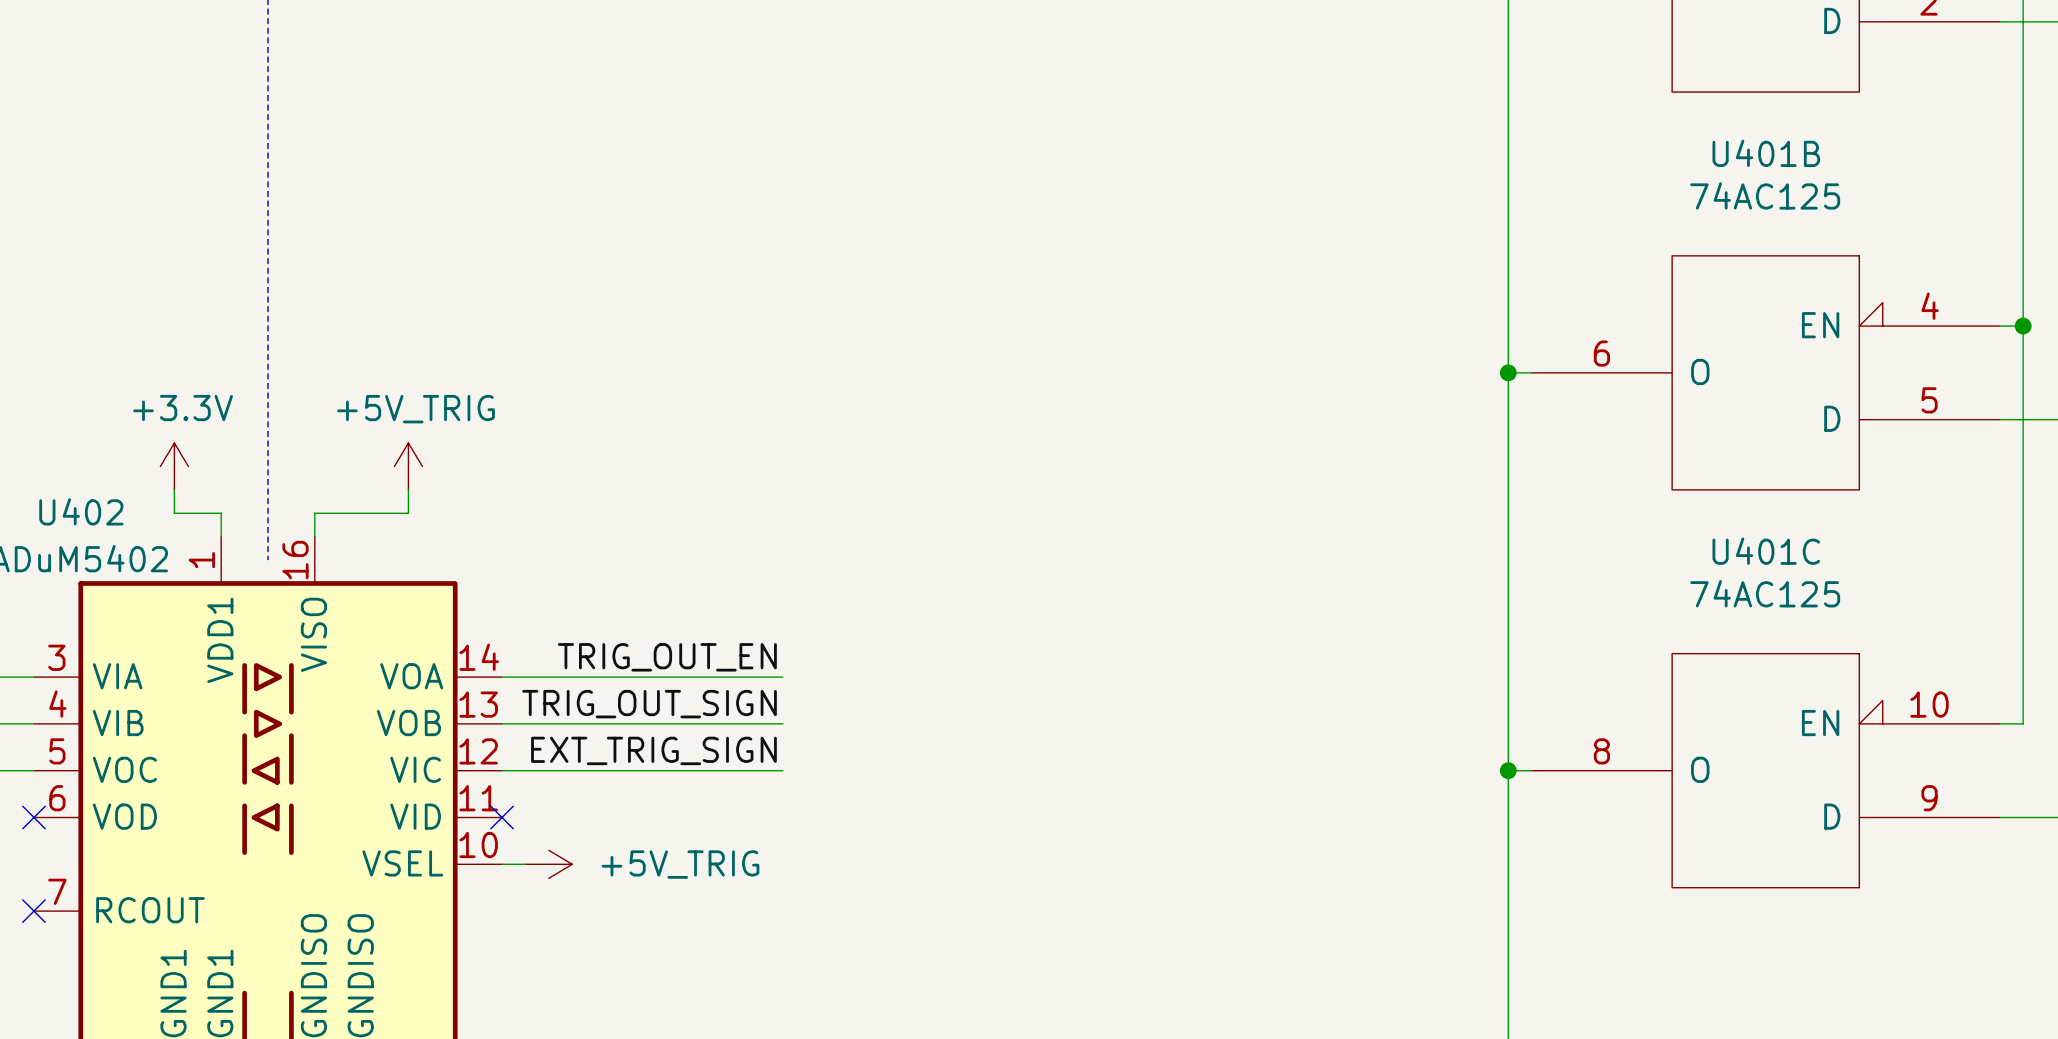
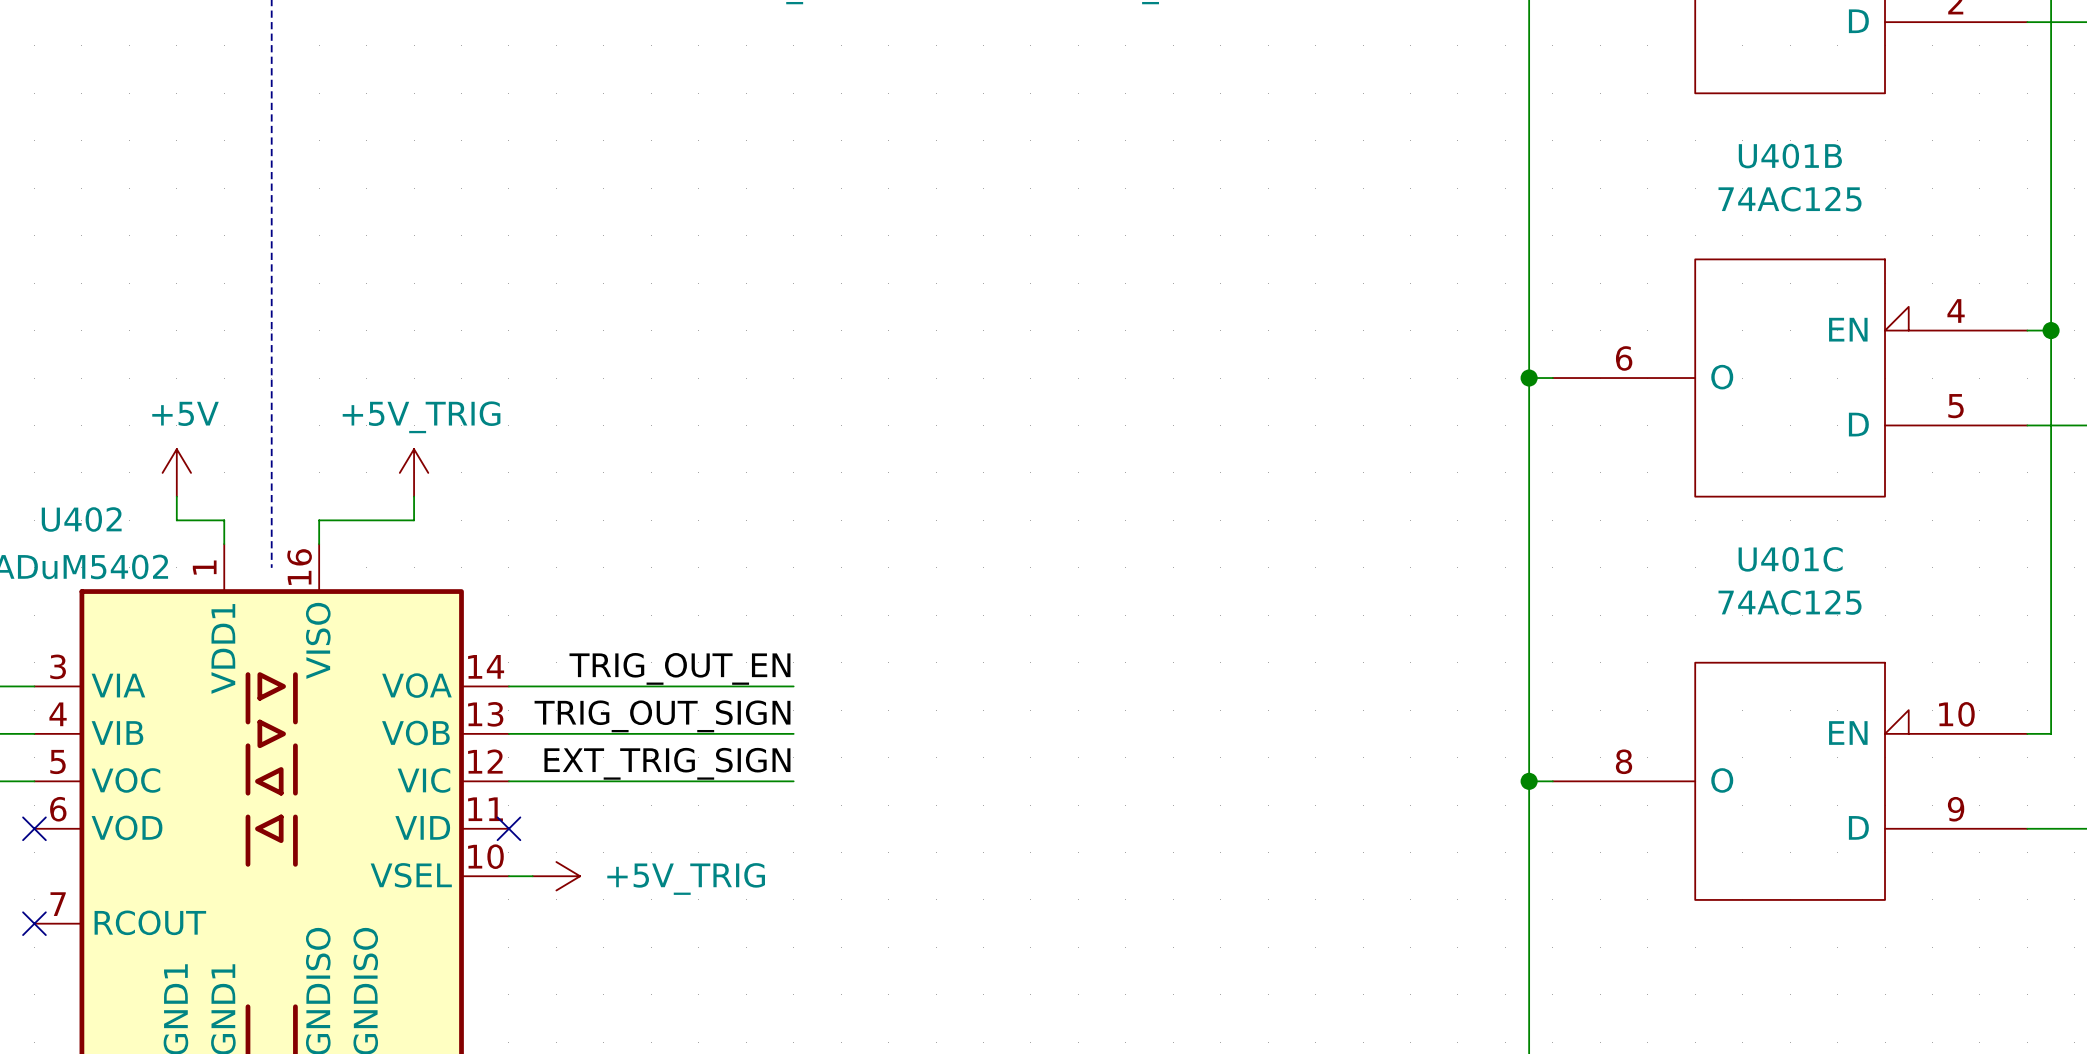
power symbol: +3.3V (174, 466) -> +5V (176, 472)

